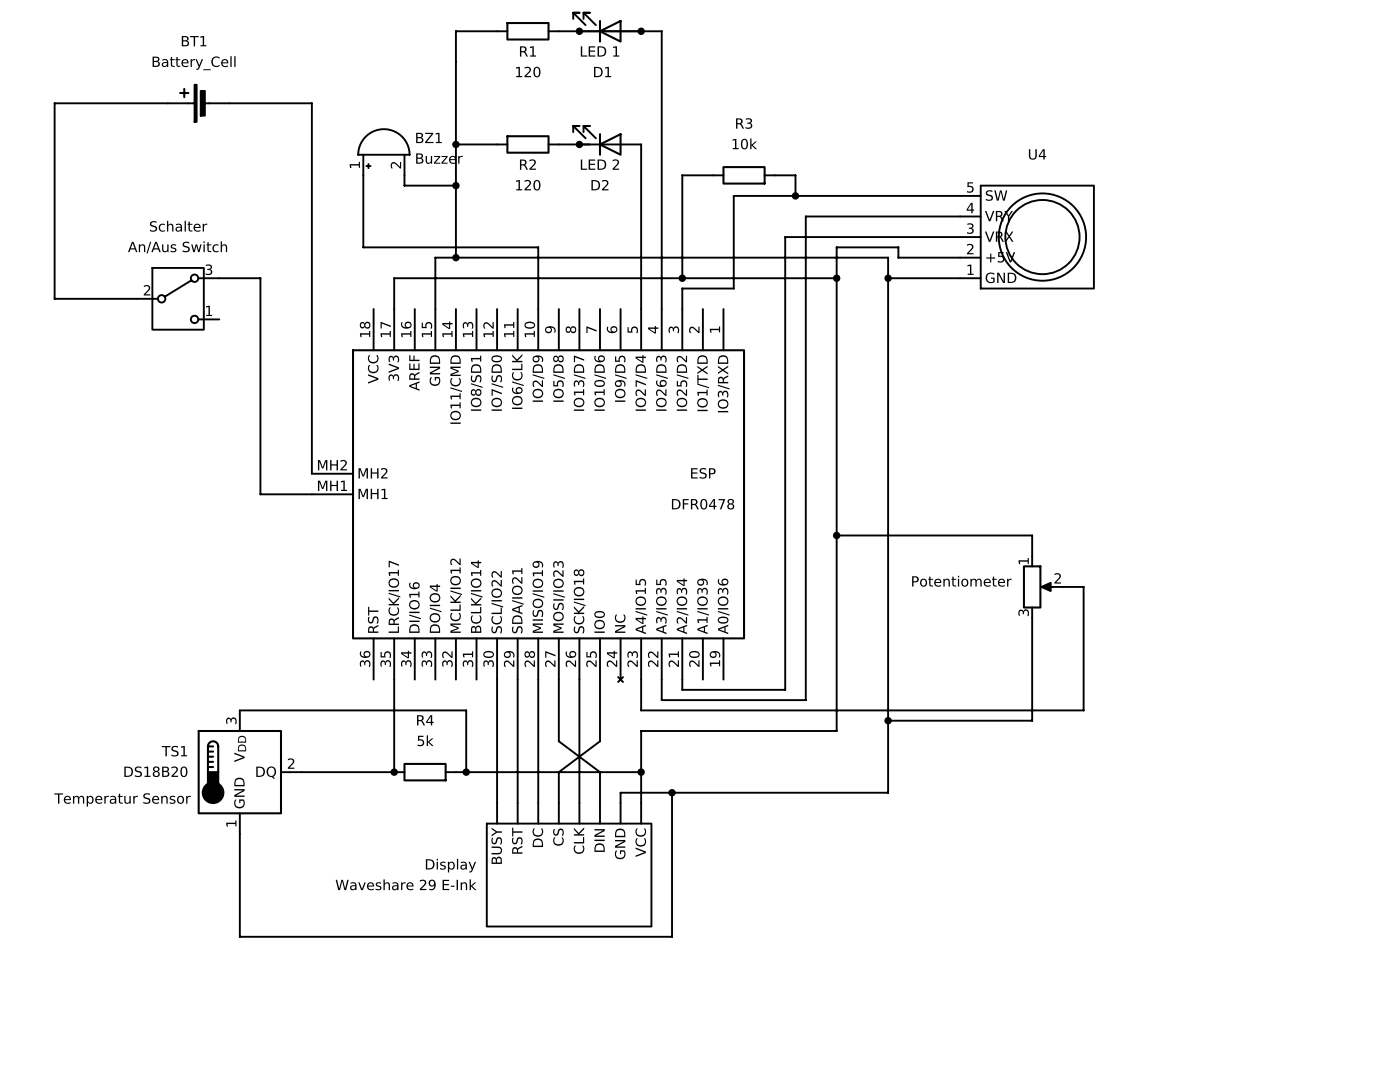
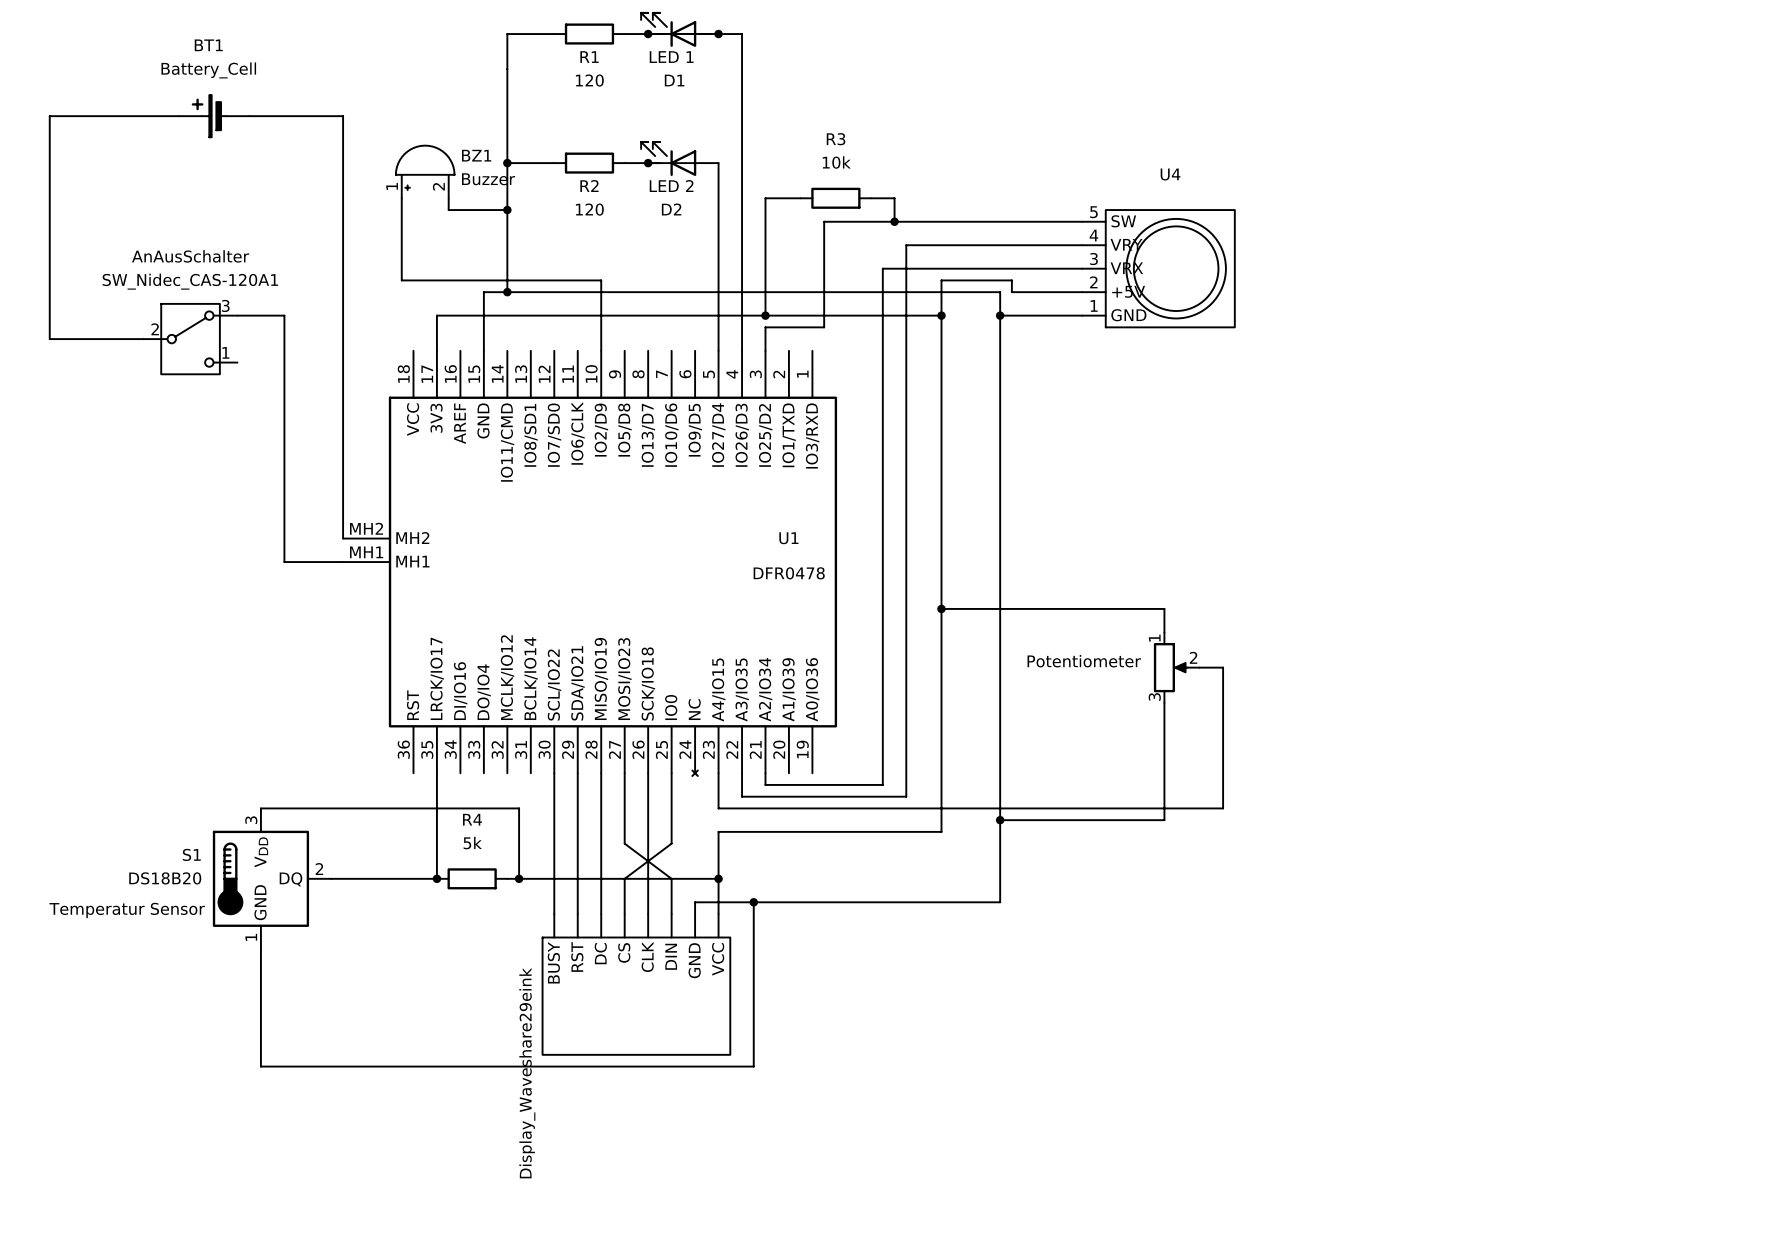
Schalter name: Schalter (178, 226) -> AnAusSchalter (190, 256)
Schalter value: An/Aus Switch (177, 247) -> SW_Nidec_CAS-120A1 (190, 281)
ESP name: ESP (703, 473) -> U1 (788, 538)
TS1 name: TS1 (174, 751) -> S1 (191, 854)
Display name: Display (450, 865) -> Display_Waveshare29eink (527, 1073)
Display value: Waveshare 29 E-Ink (406, 884) -> none

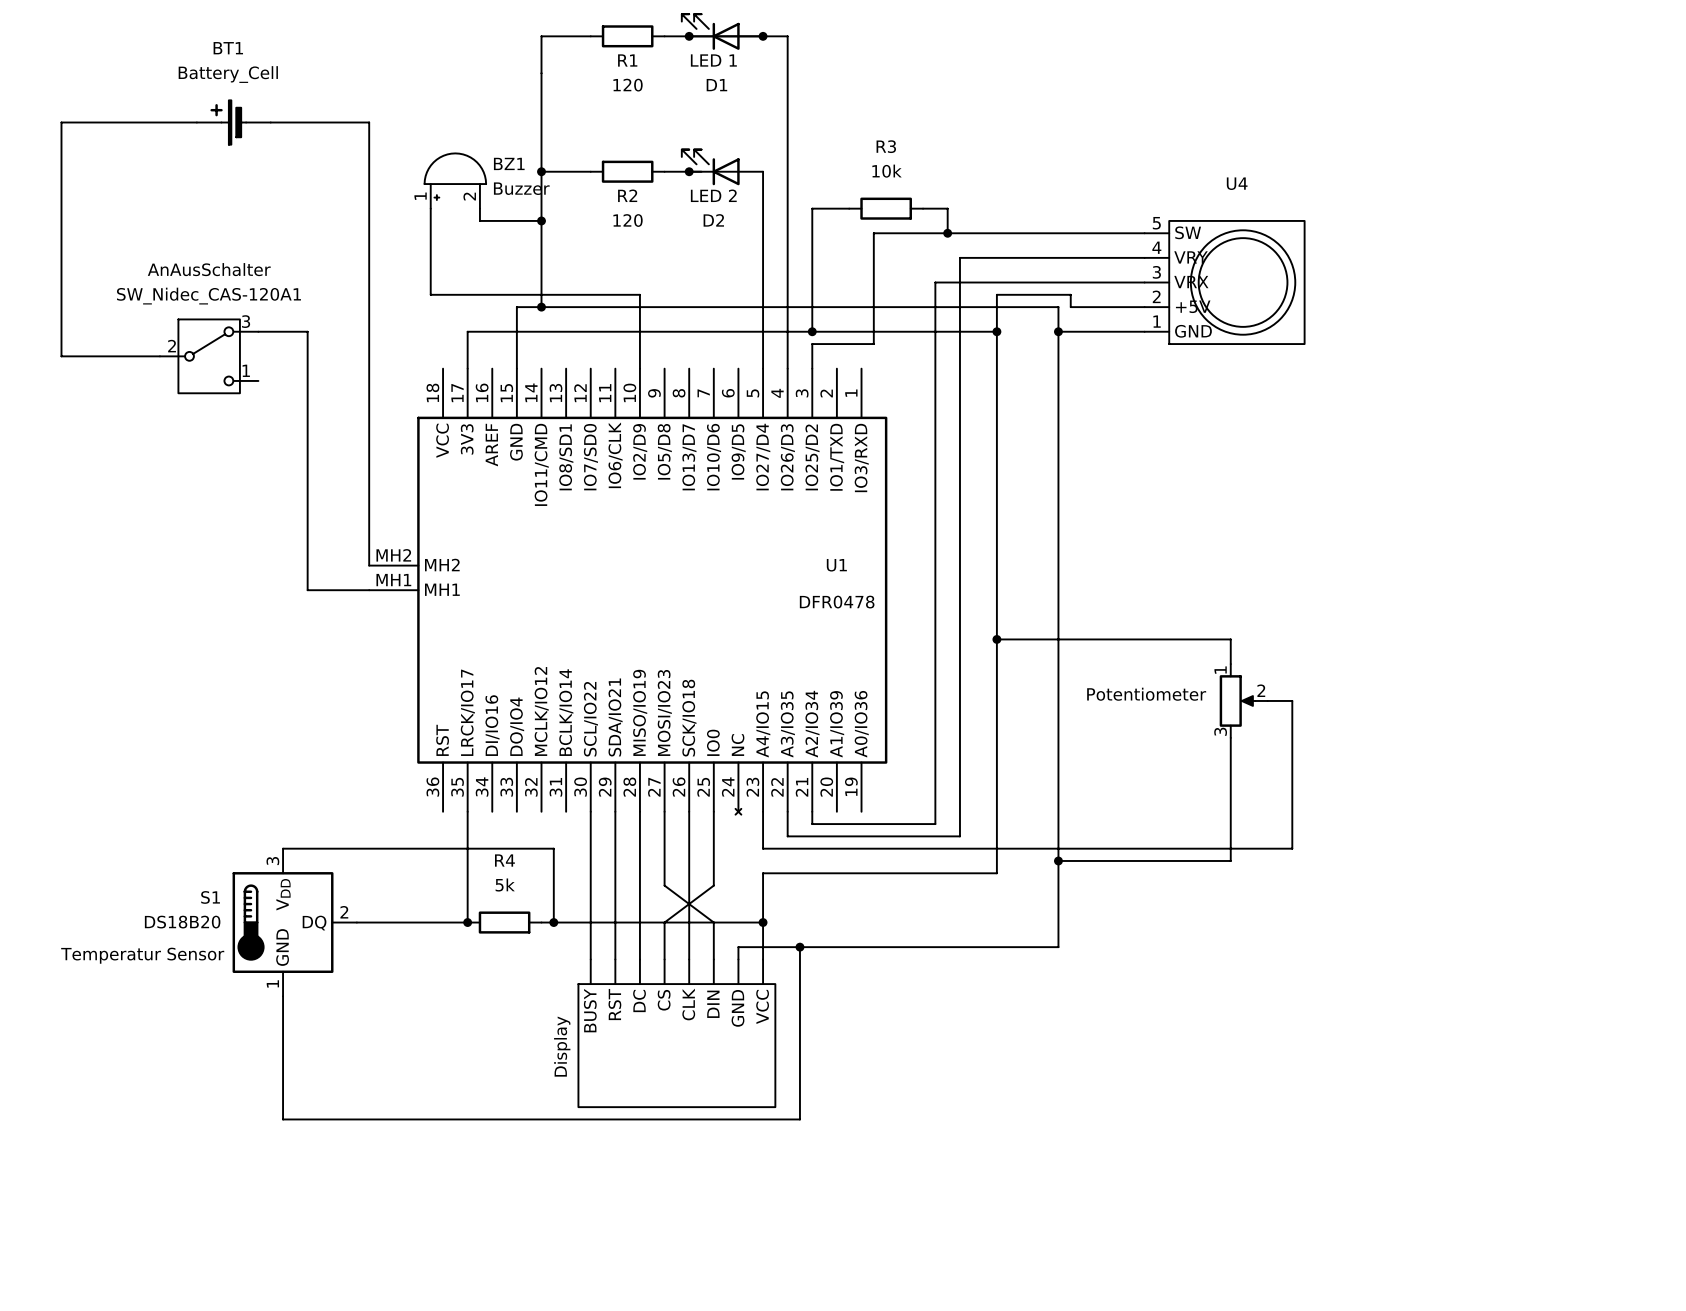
Display_Waveshare29eink name: Display_Waveshare29eink (527, 1073) -> Display (562, 1046)

